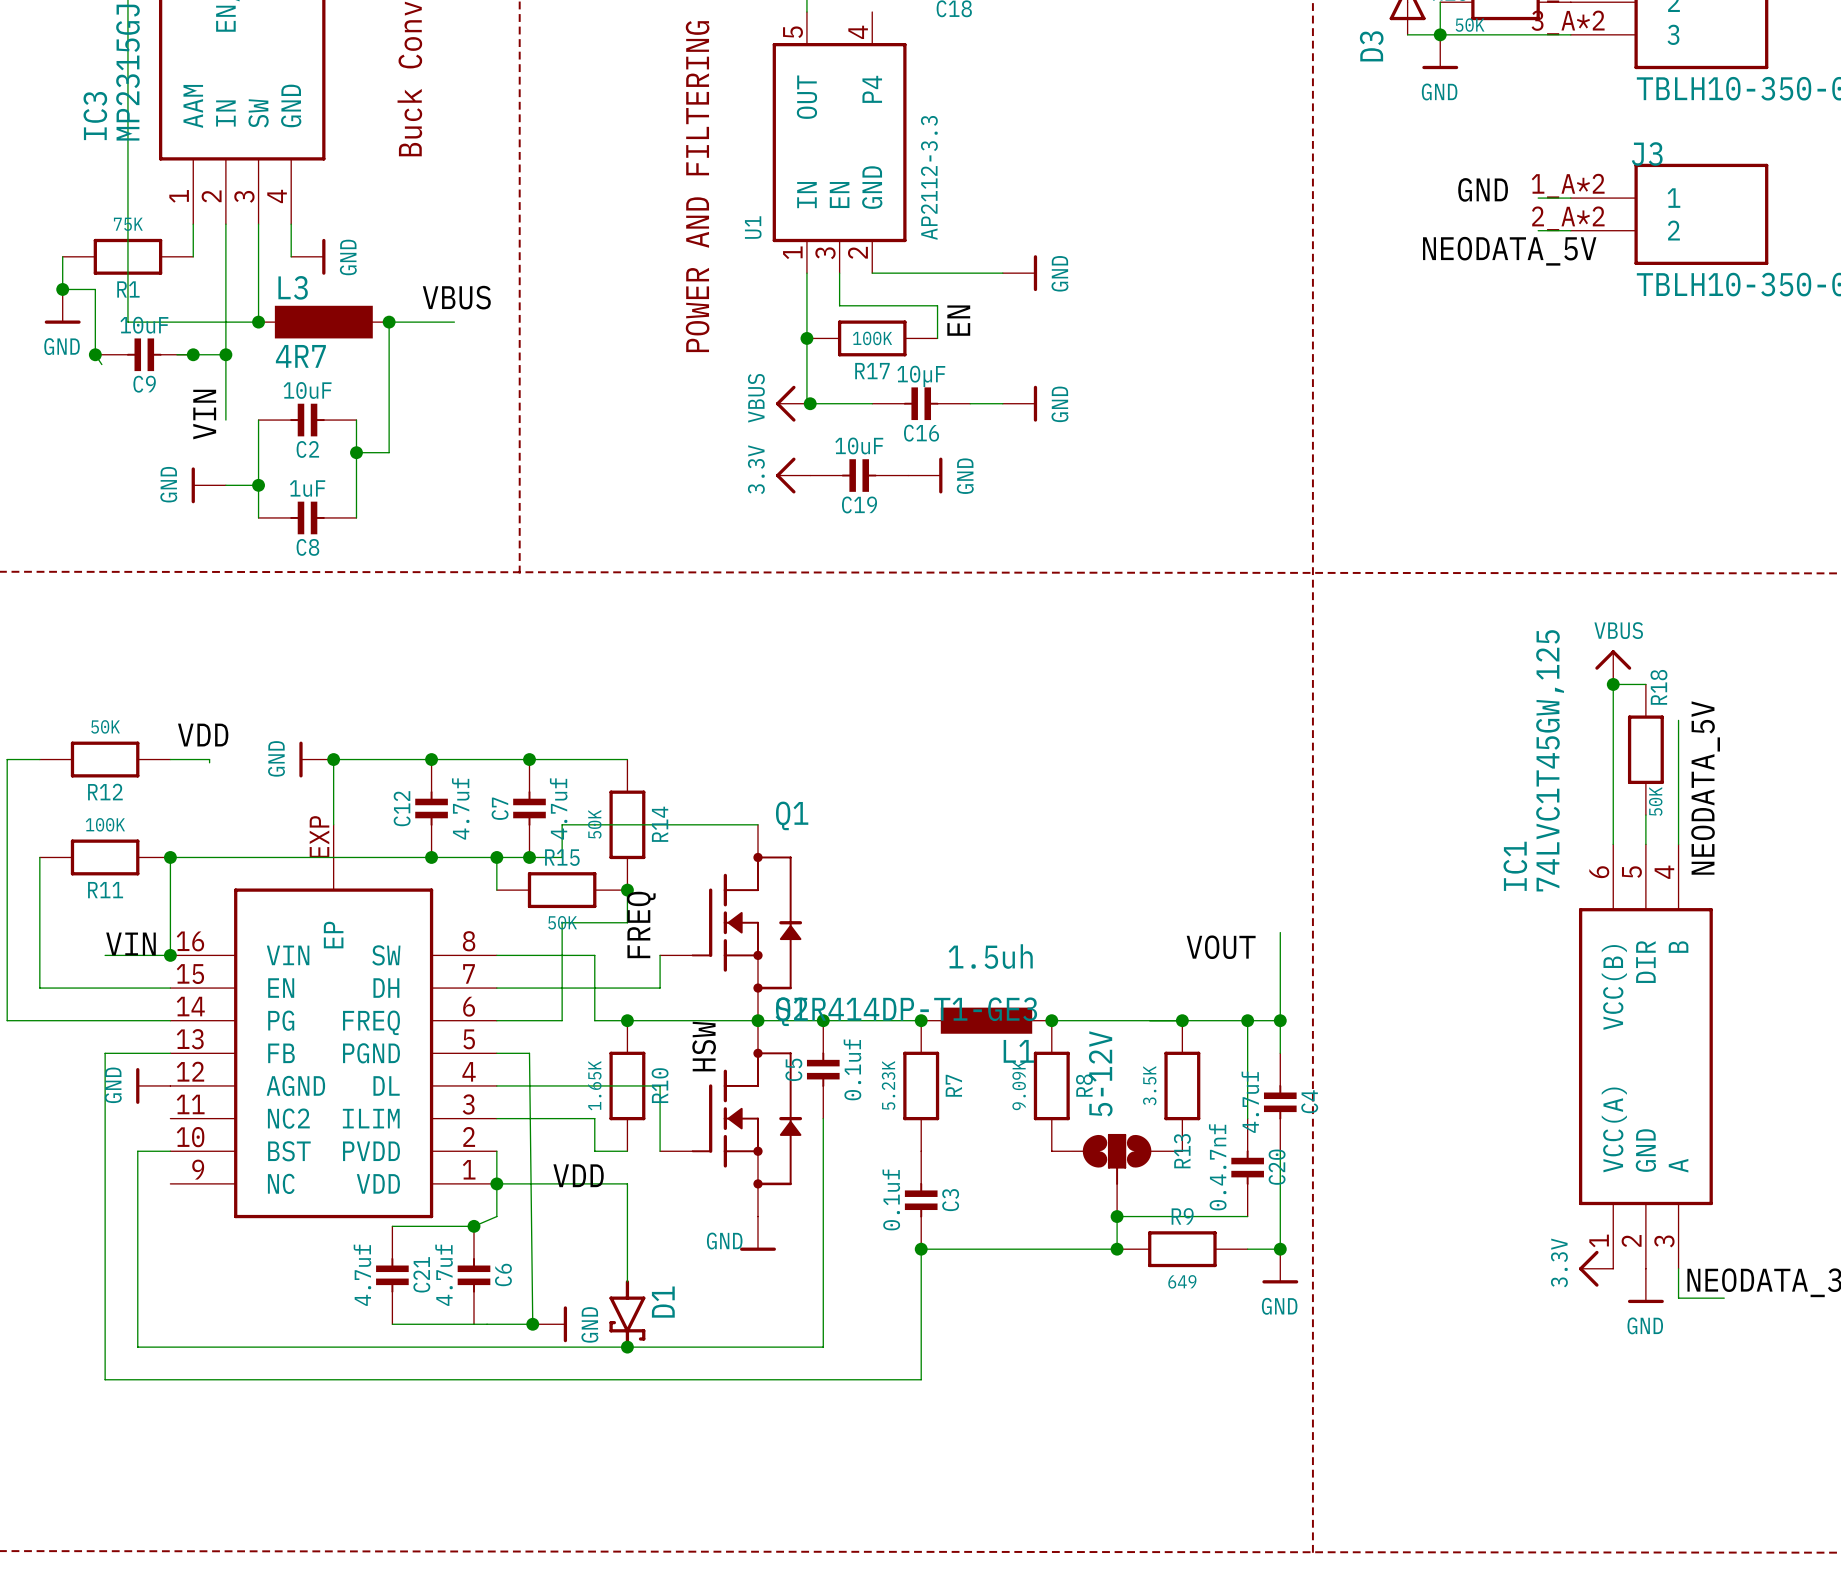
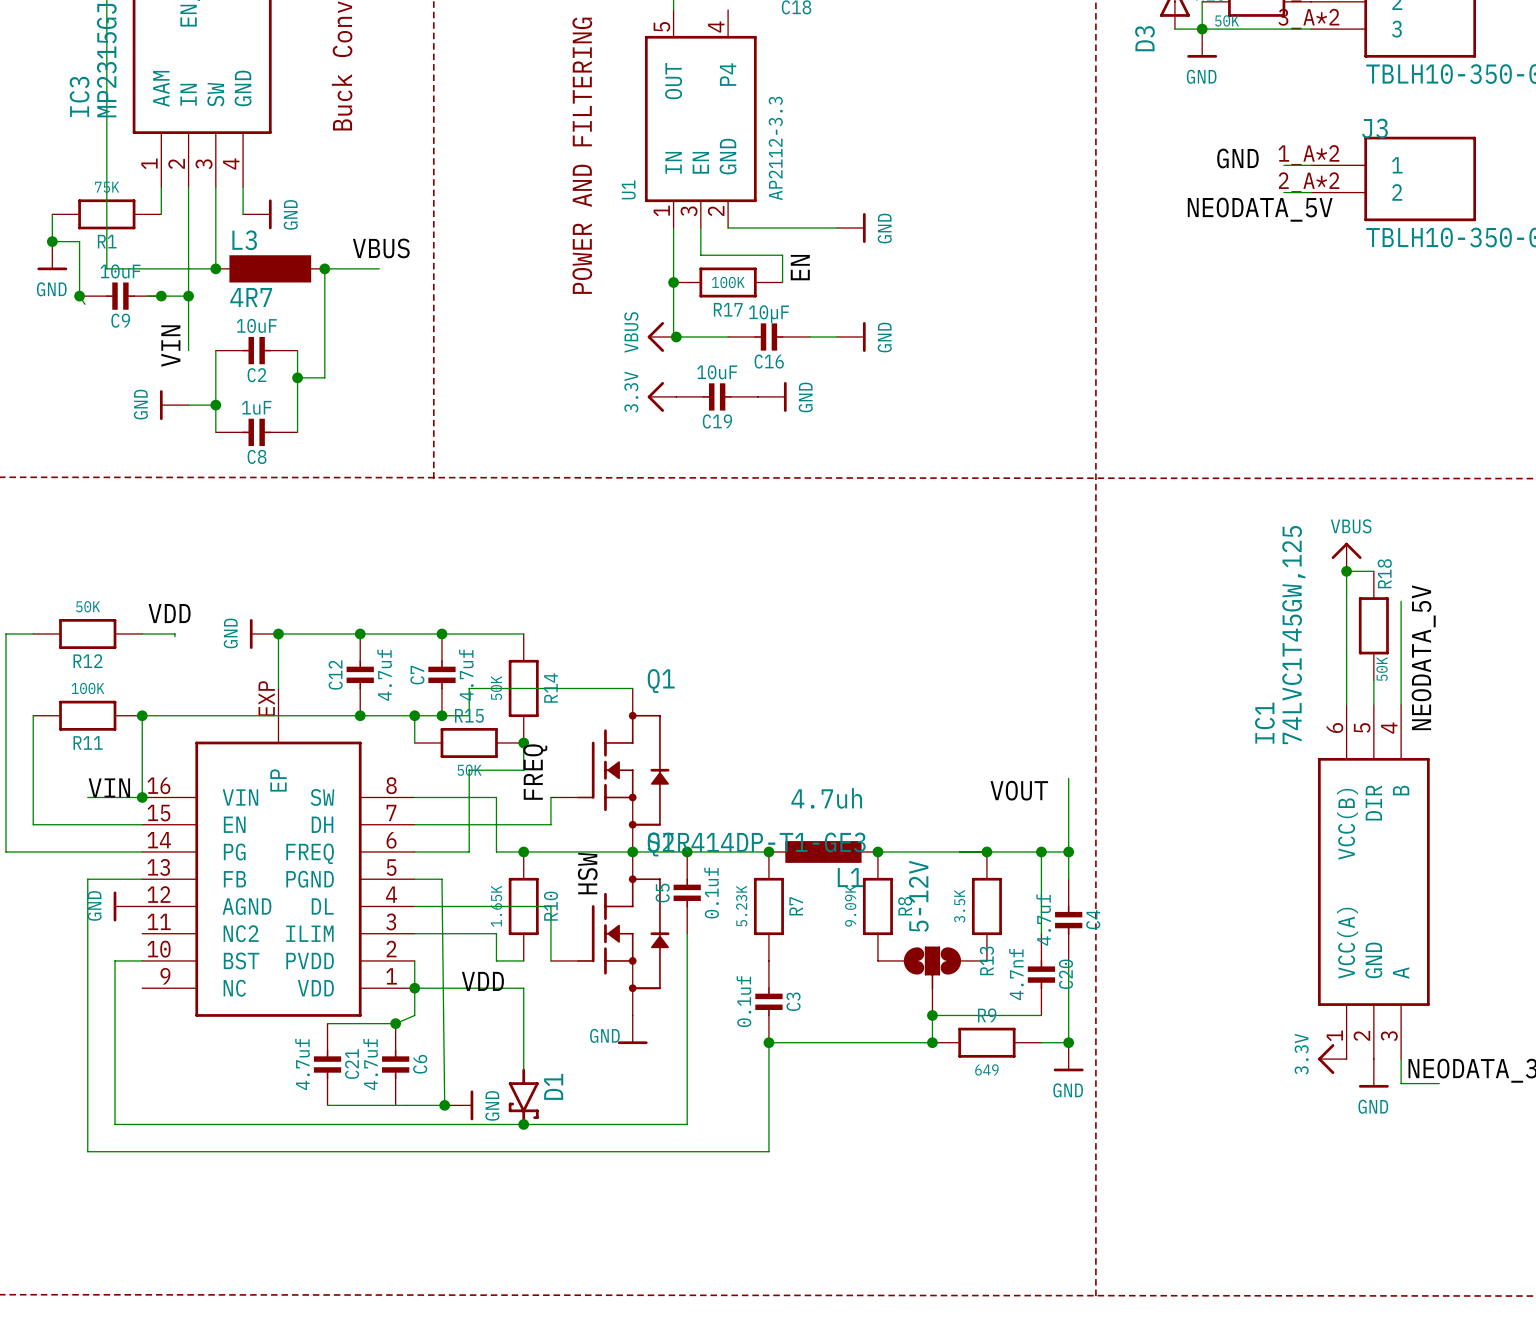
L1 value: 1.5uh (990, 956) -> 4.7uh (826, 798)
C20 value: 0.4.7nf (1217, 1167) -> 4.7nf (1016, 974)

